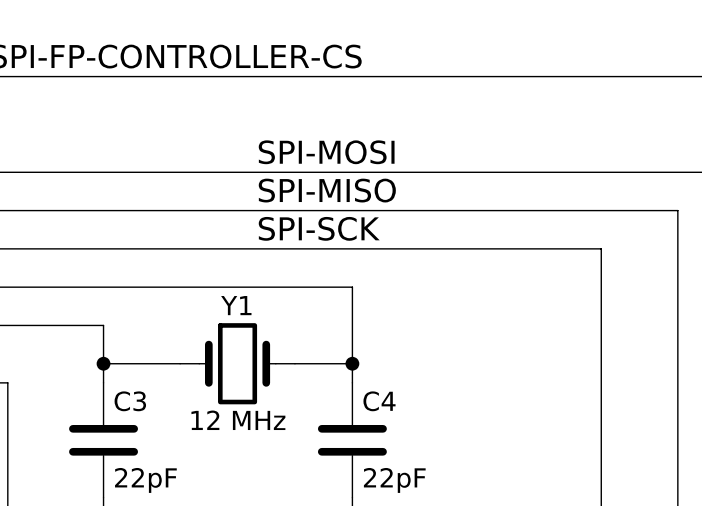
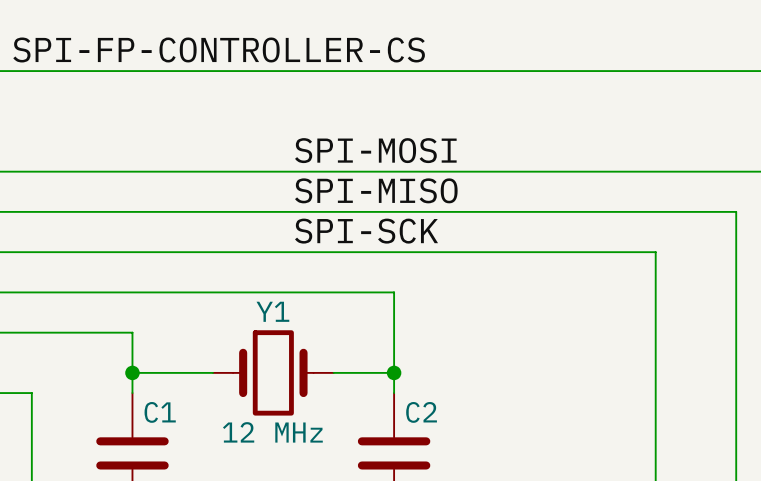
C3 name: C3 (130, 401) -> C1 (160, 412)
C4 name: C4 (379, 401) -> C2 (421, 412)

